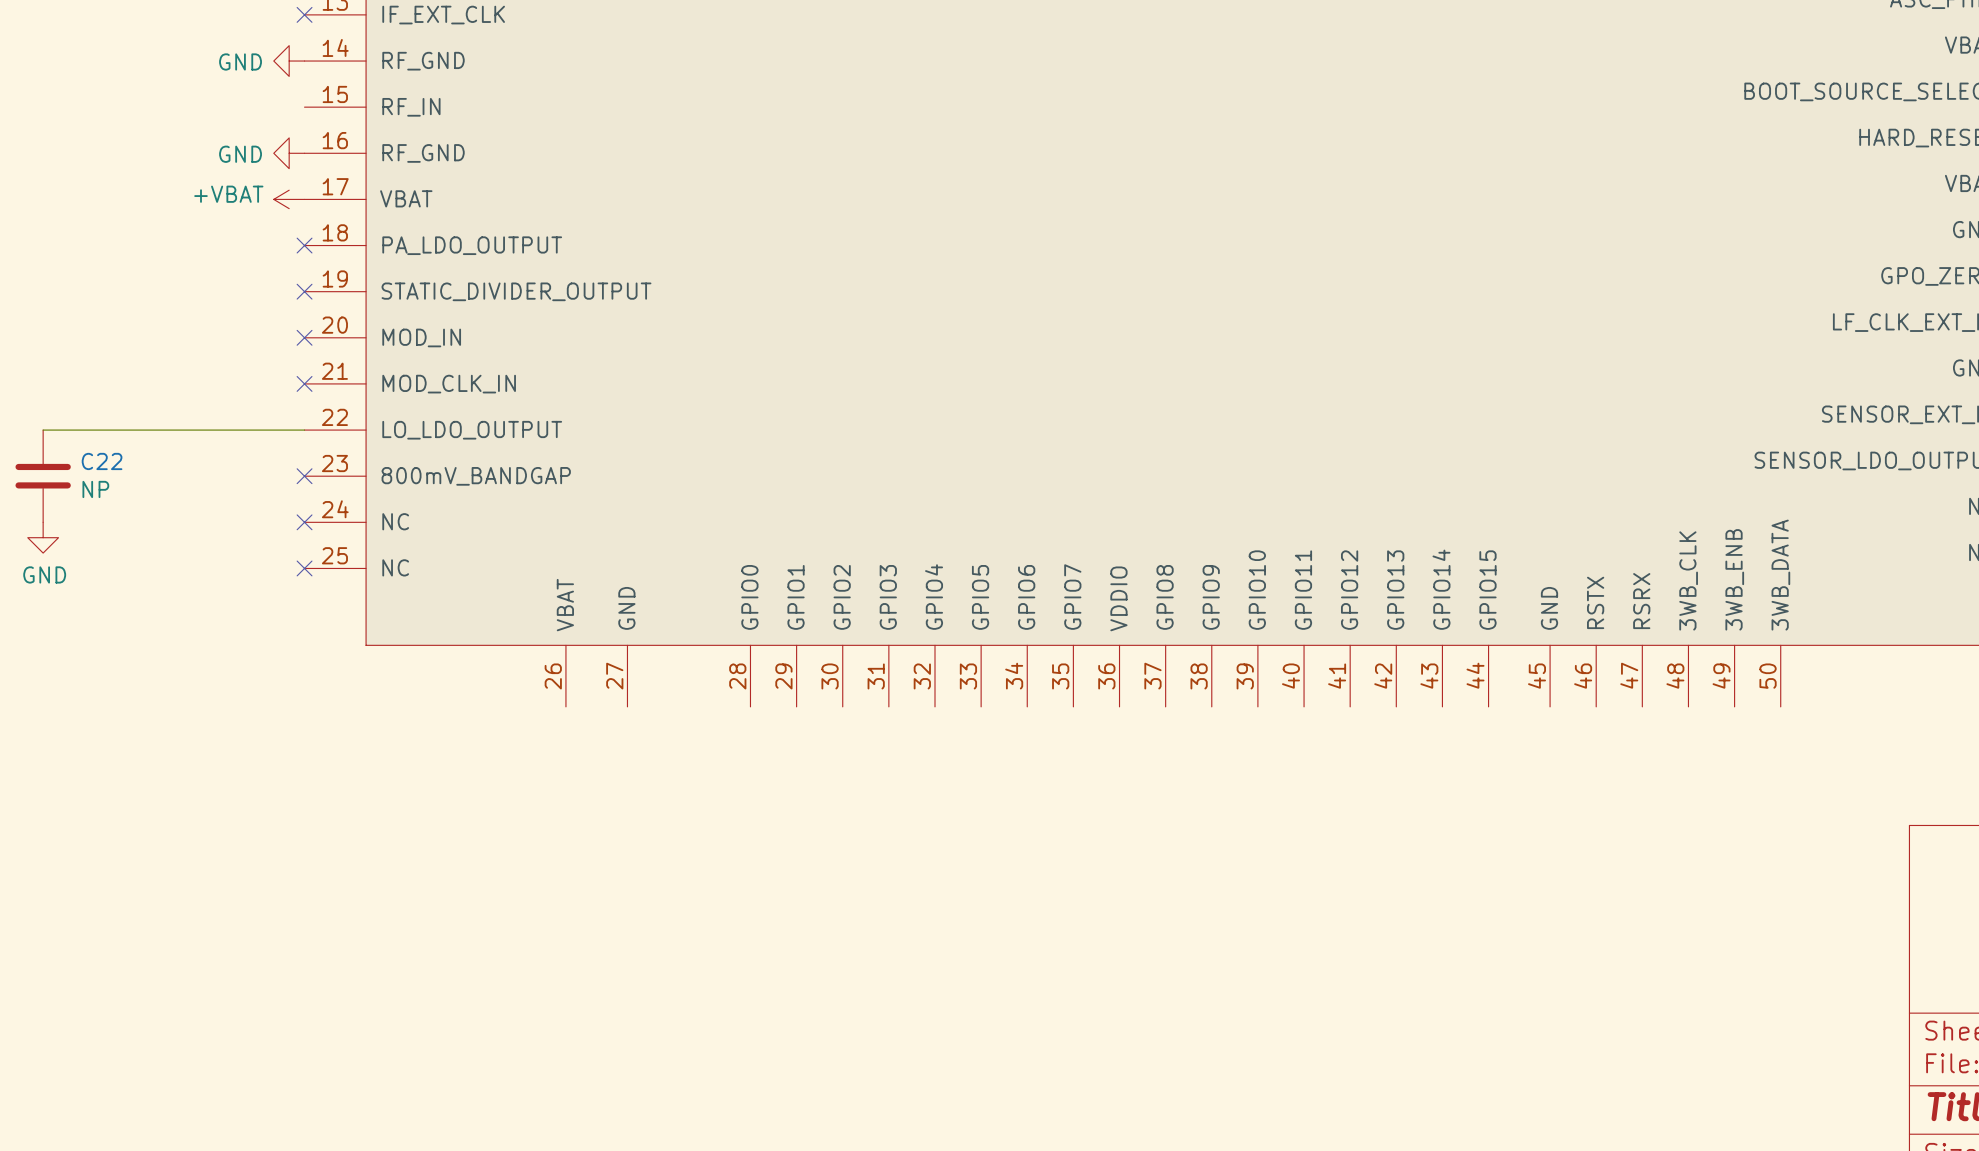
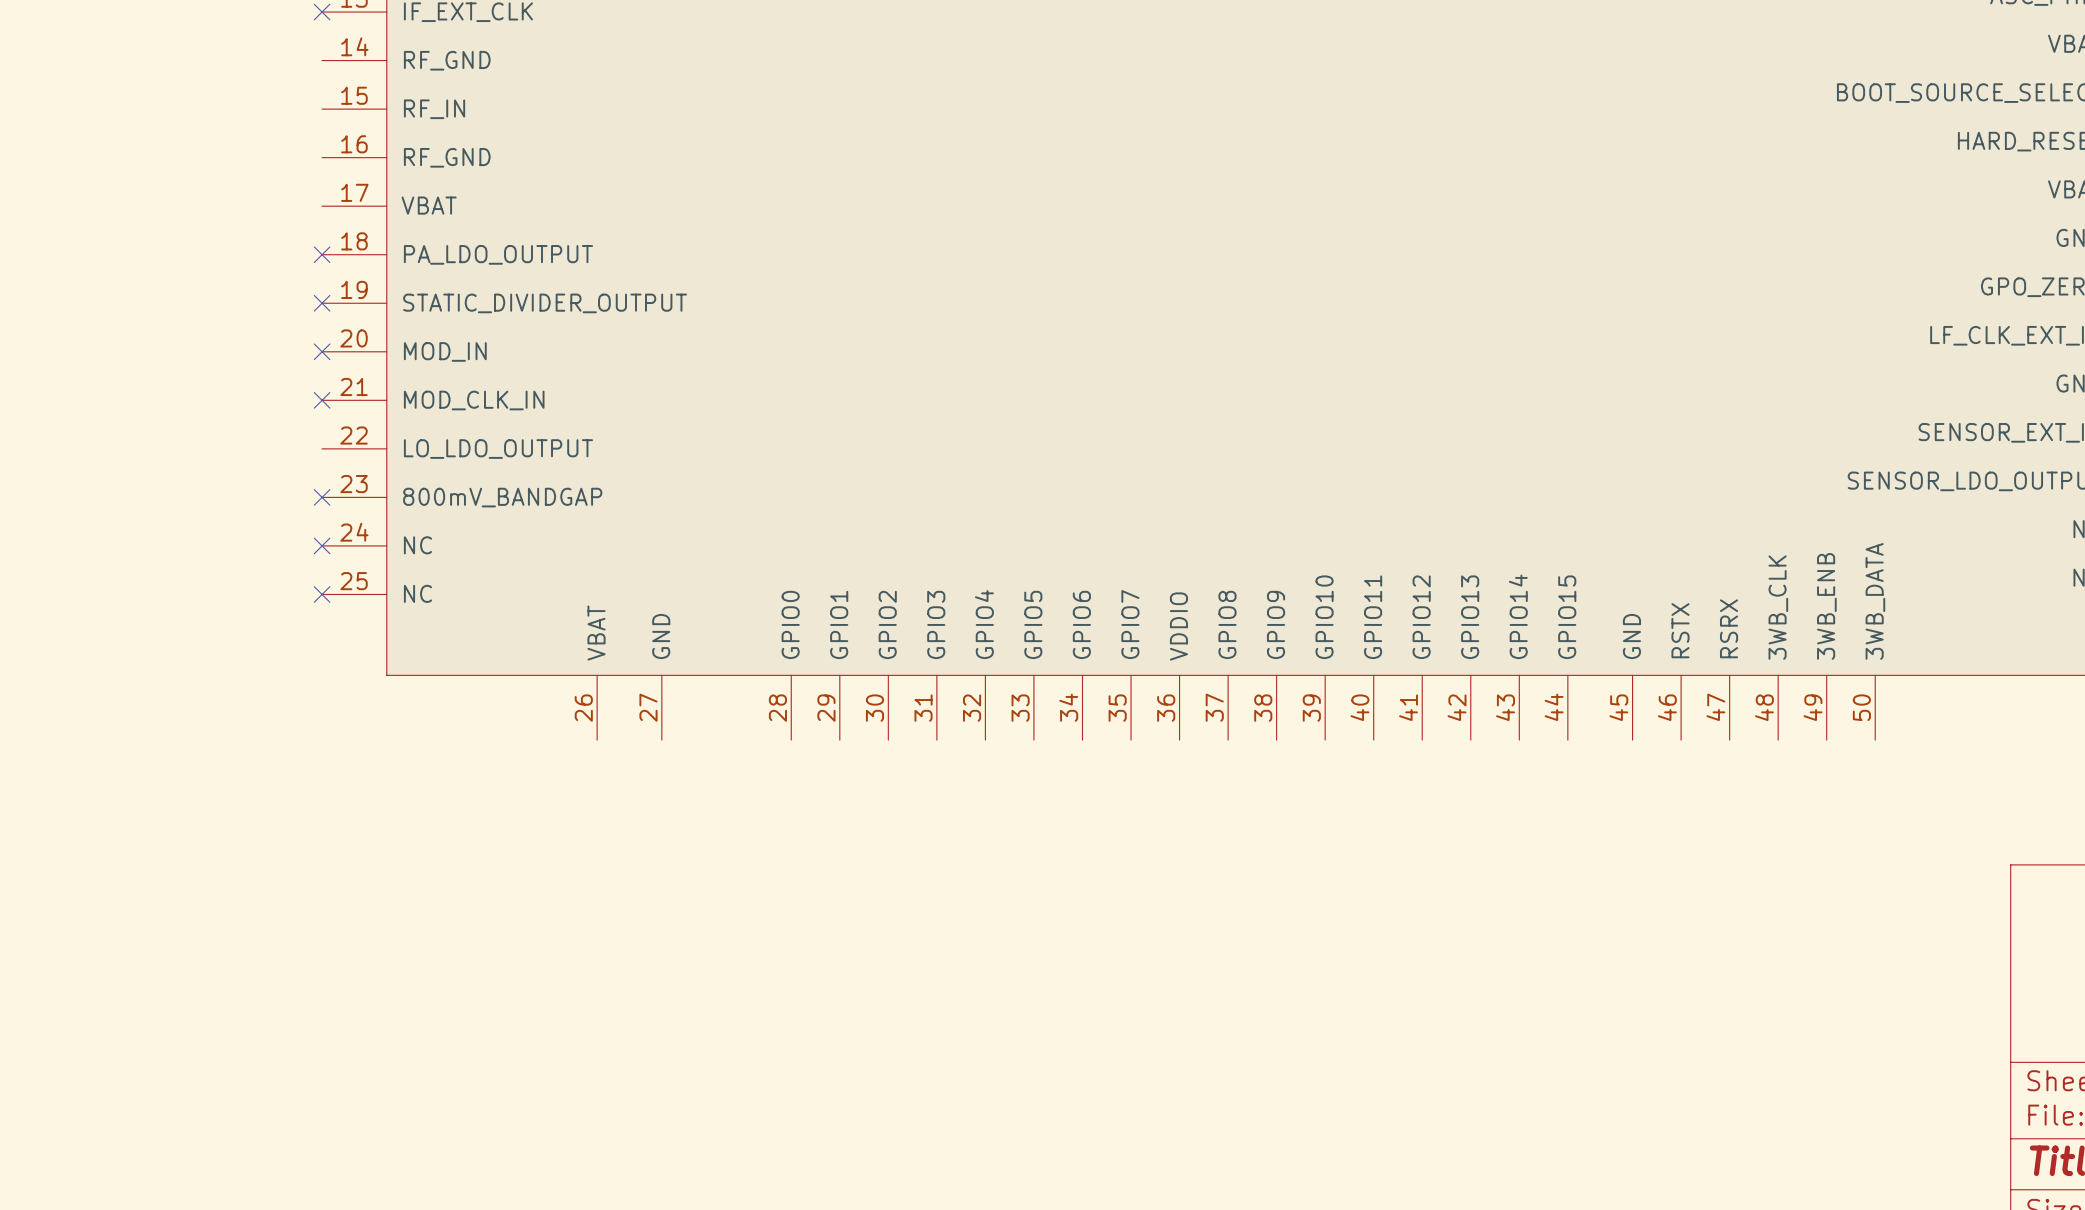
power symbol: GND (289, 61) -> none
power symbol: GND (289, 153) -> none
power symbol: +VBAT (289, 199) -> none
wire: (43, 430) (304, 430) -> none
C22: NP (43, 476) -> none
power symbol: GND (43, 537) -> none

